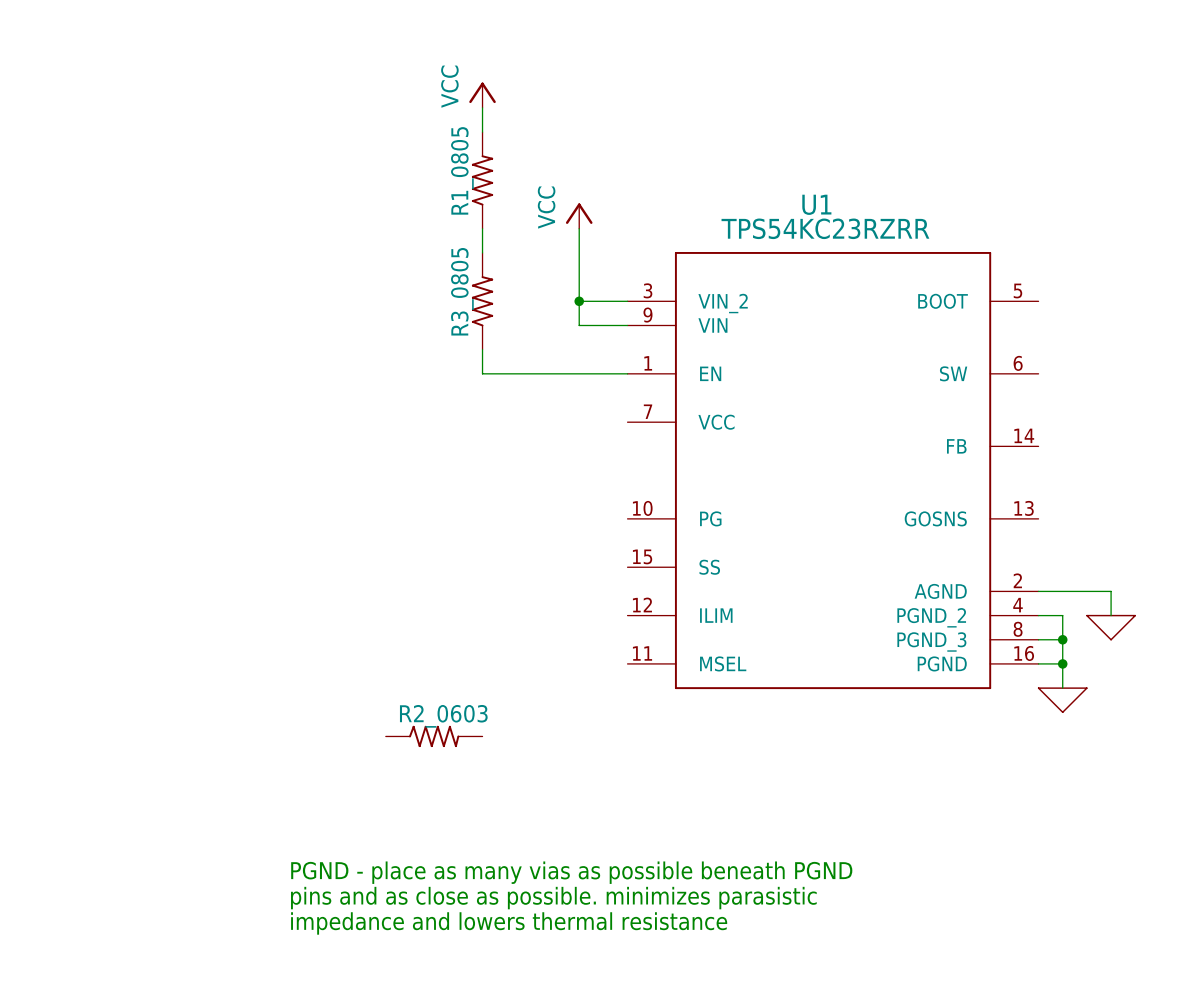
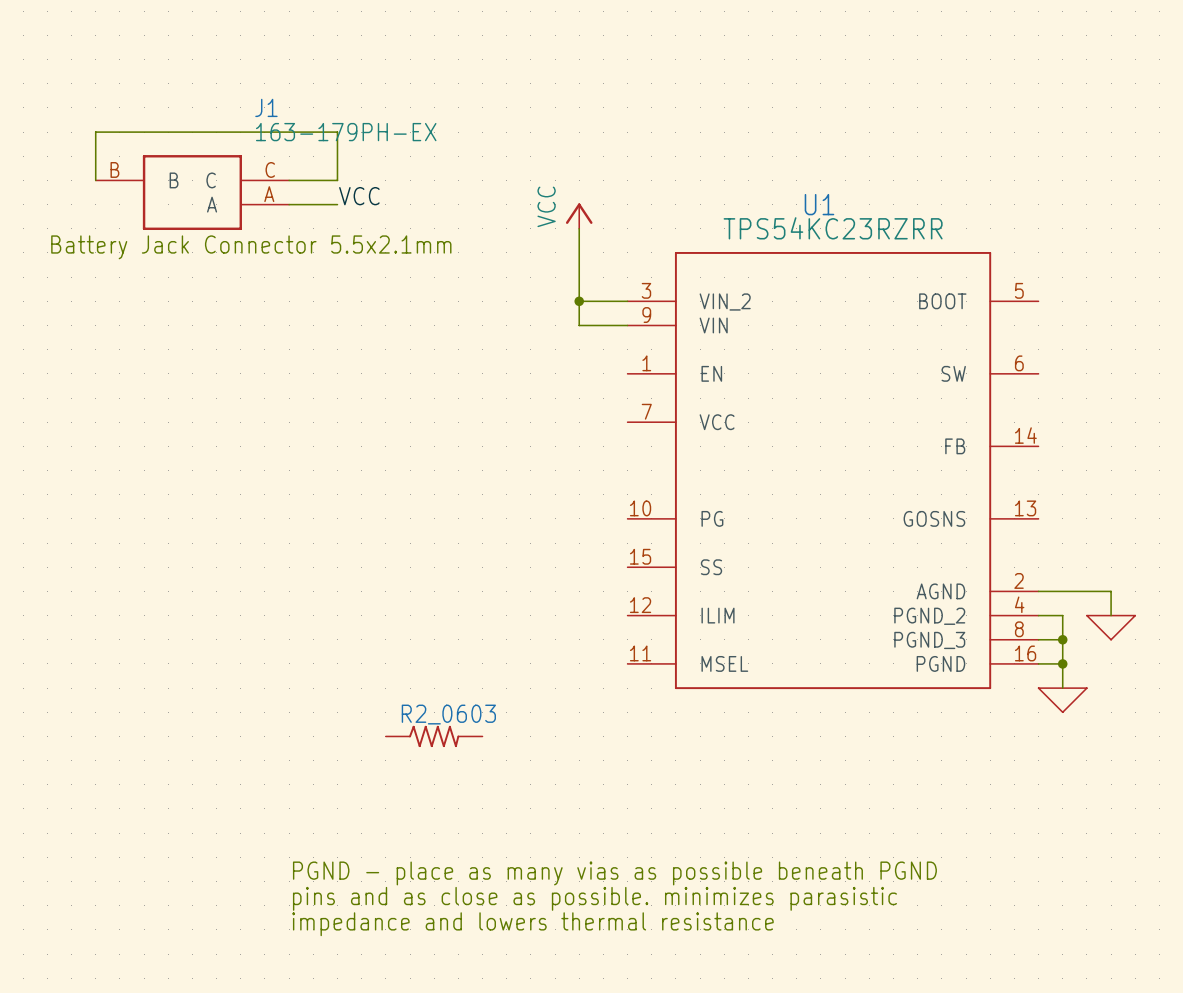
power symbol: VCC (482, 95) -> none
wire: (482, 107) (482, 132) -> none
wire: none -> (95, 180) (95, 132) (337, 132) (337, 180) (289, 180)
R1_0805: (482, 180) -> none
J1: none -> 163-179PH-EX (192, 192)
label: none -> VCC (359, 196)
wire: none -> (289, 204) (337, 204)
wire: (482, 228) (482, 252) -> none
text: none -> Battery Jack Connector 5.5x2.1mm (251, 247)
R3_0805: (482, 301) -> none
wire: (482, 349) (482, 373) (627, 373) -> none

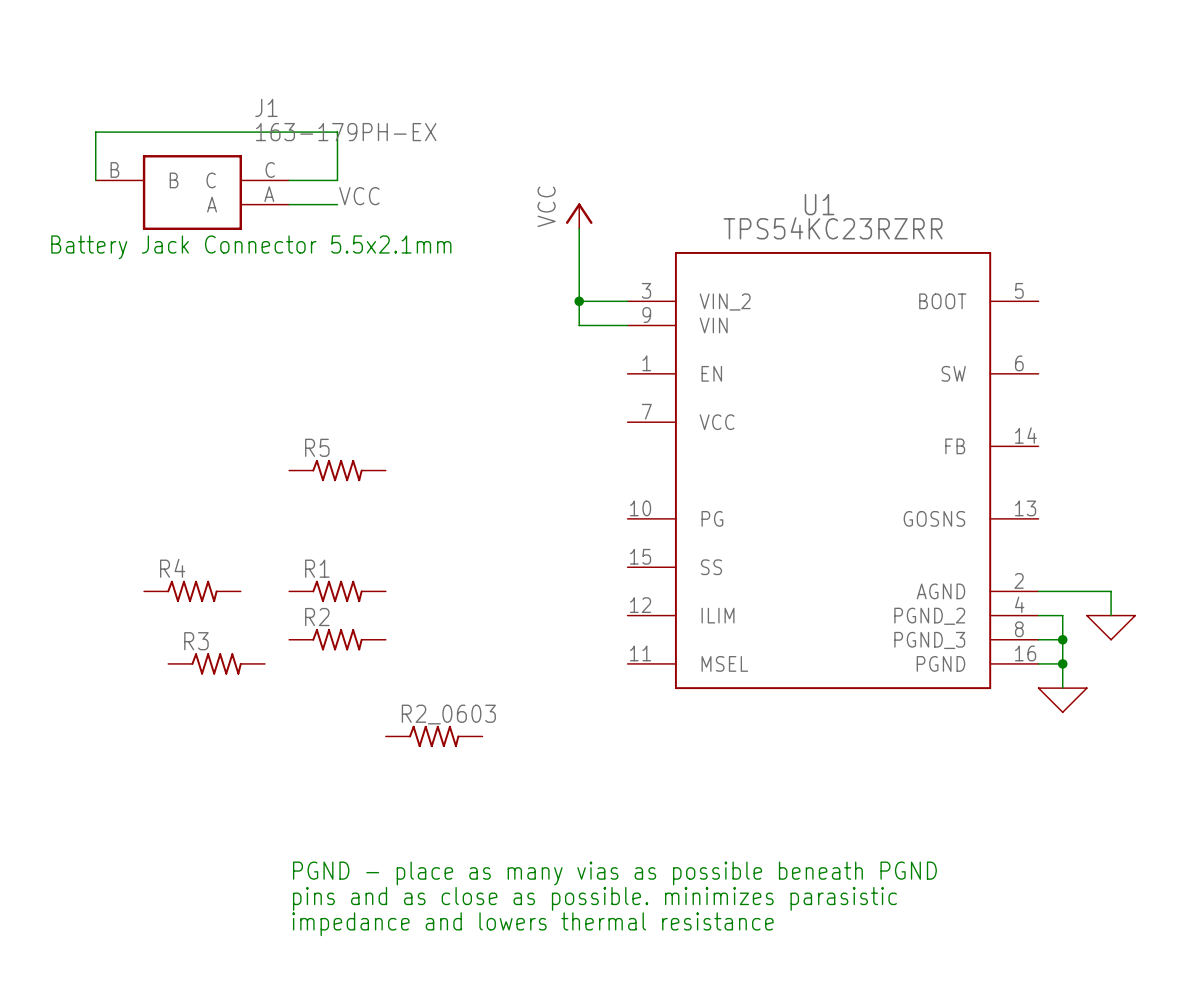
R5: none -> (337, 470)
R4: none -> (192, 591)
R1: none -> (337, 591)
R2: none -> (337, 639)
R3: none -> (216, 663)

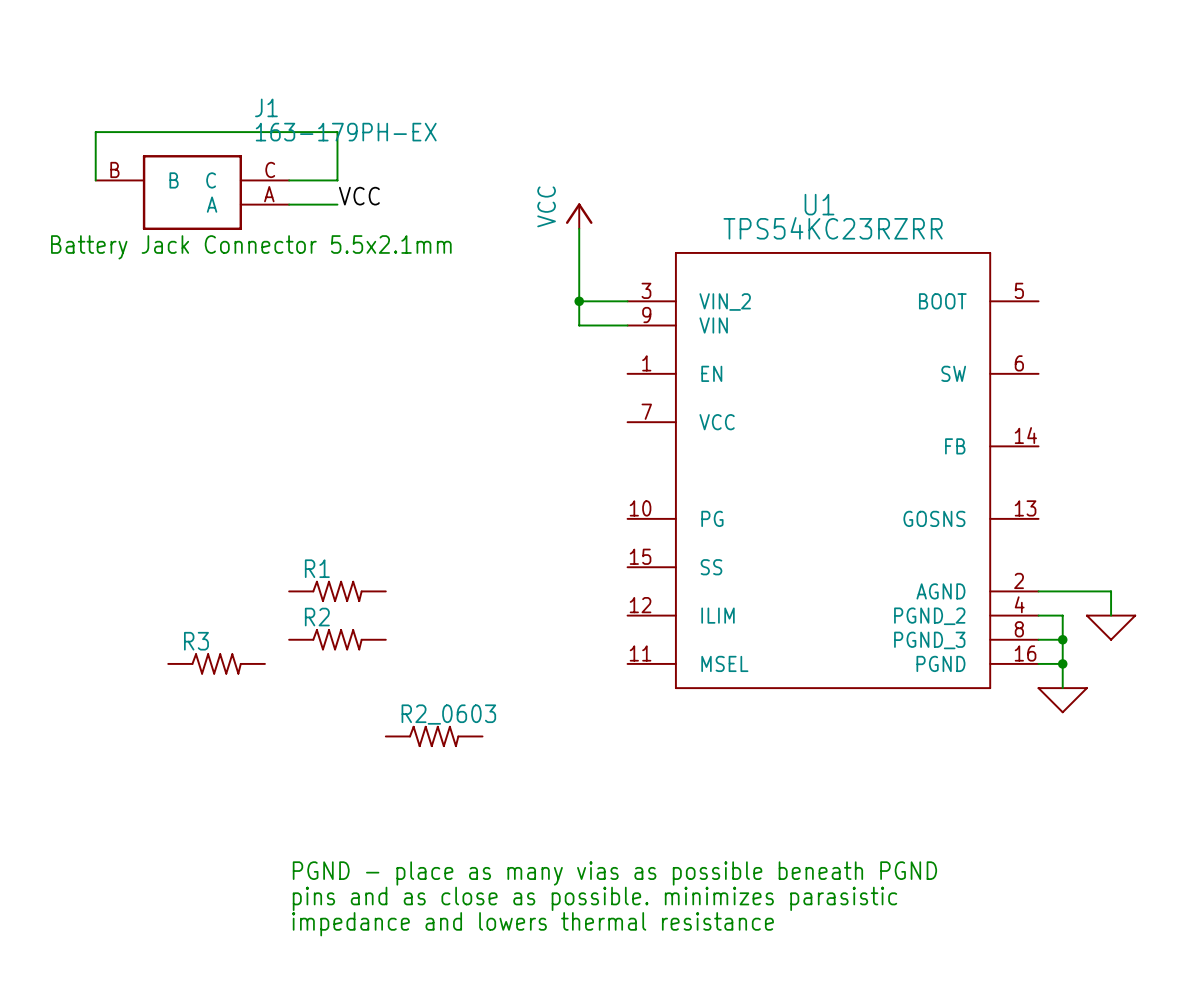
R5: (337, 470) -> none
R4: (192, 591) -> none

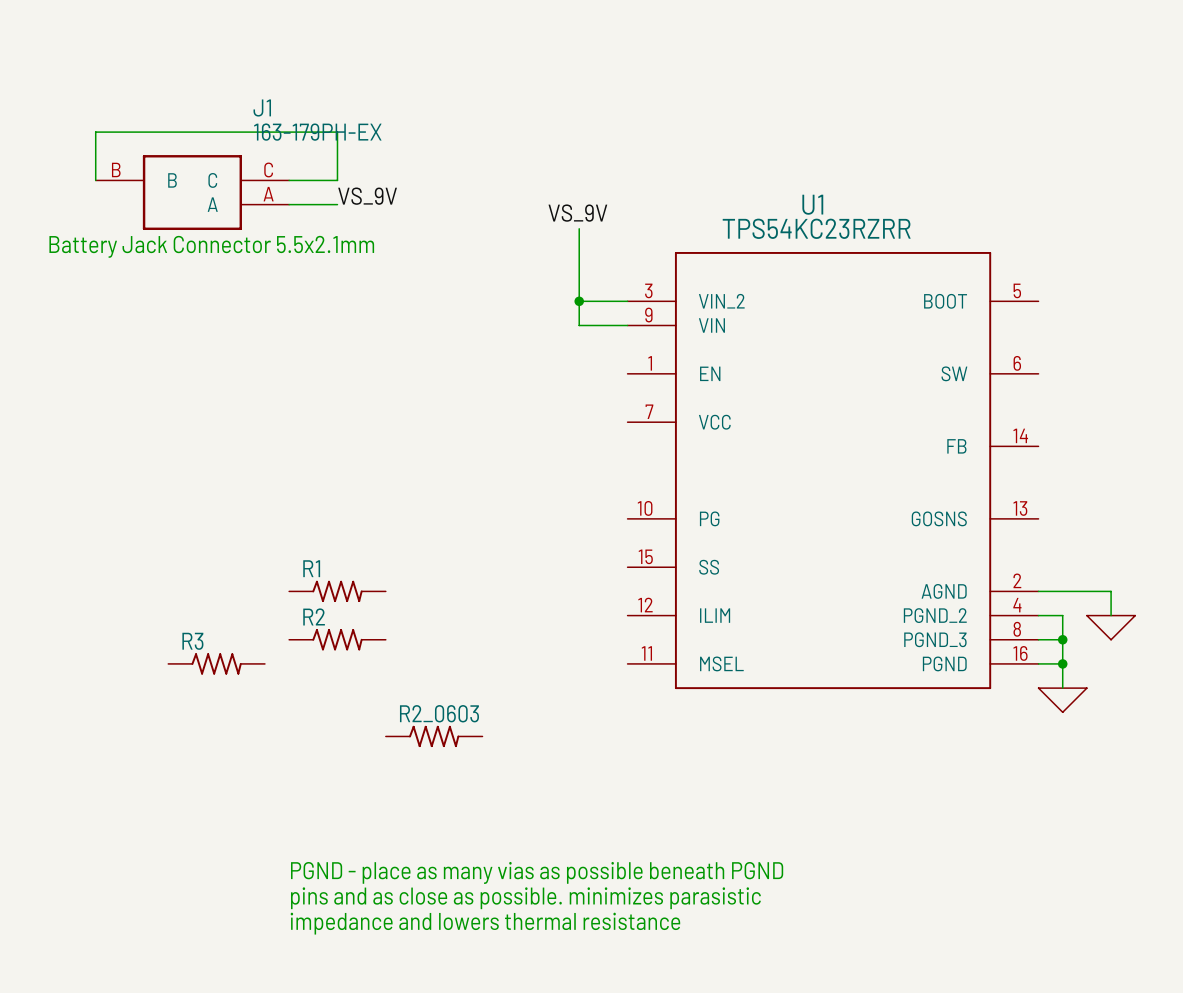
label: VCC (359, 196) -> VS_9V (367, 196)
label: none -> VS_9V (577, 213)
power symbol: VCC (579, 216) -> none

